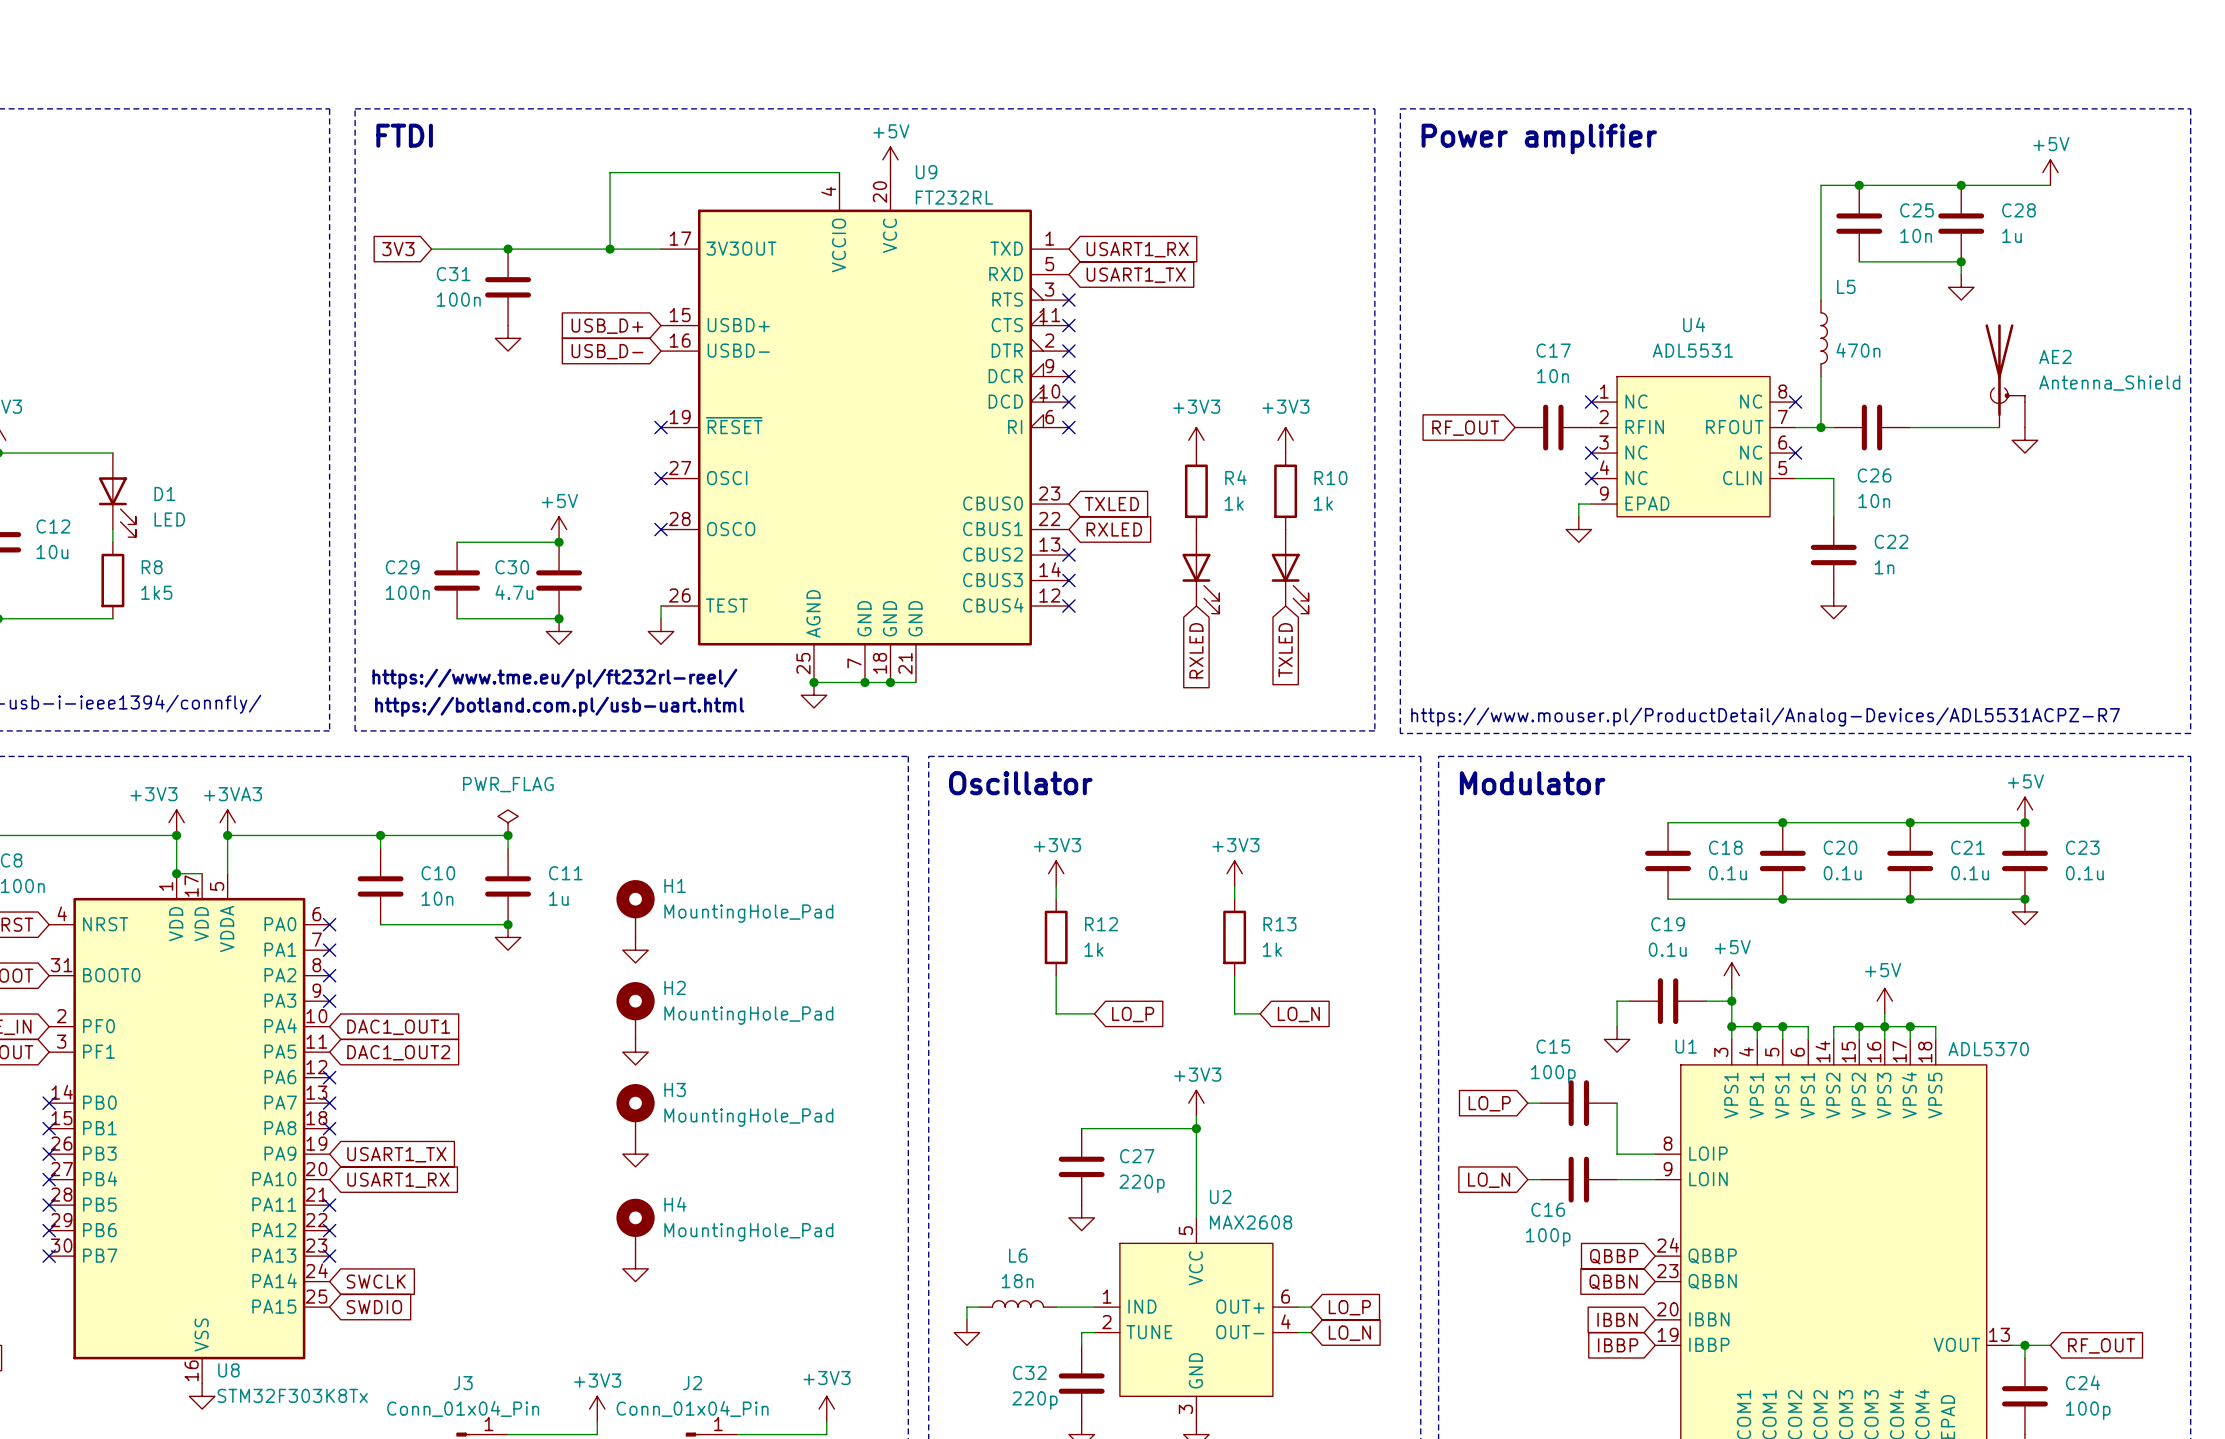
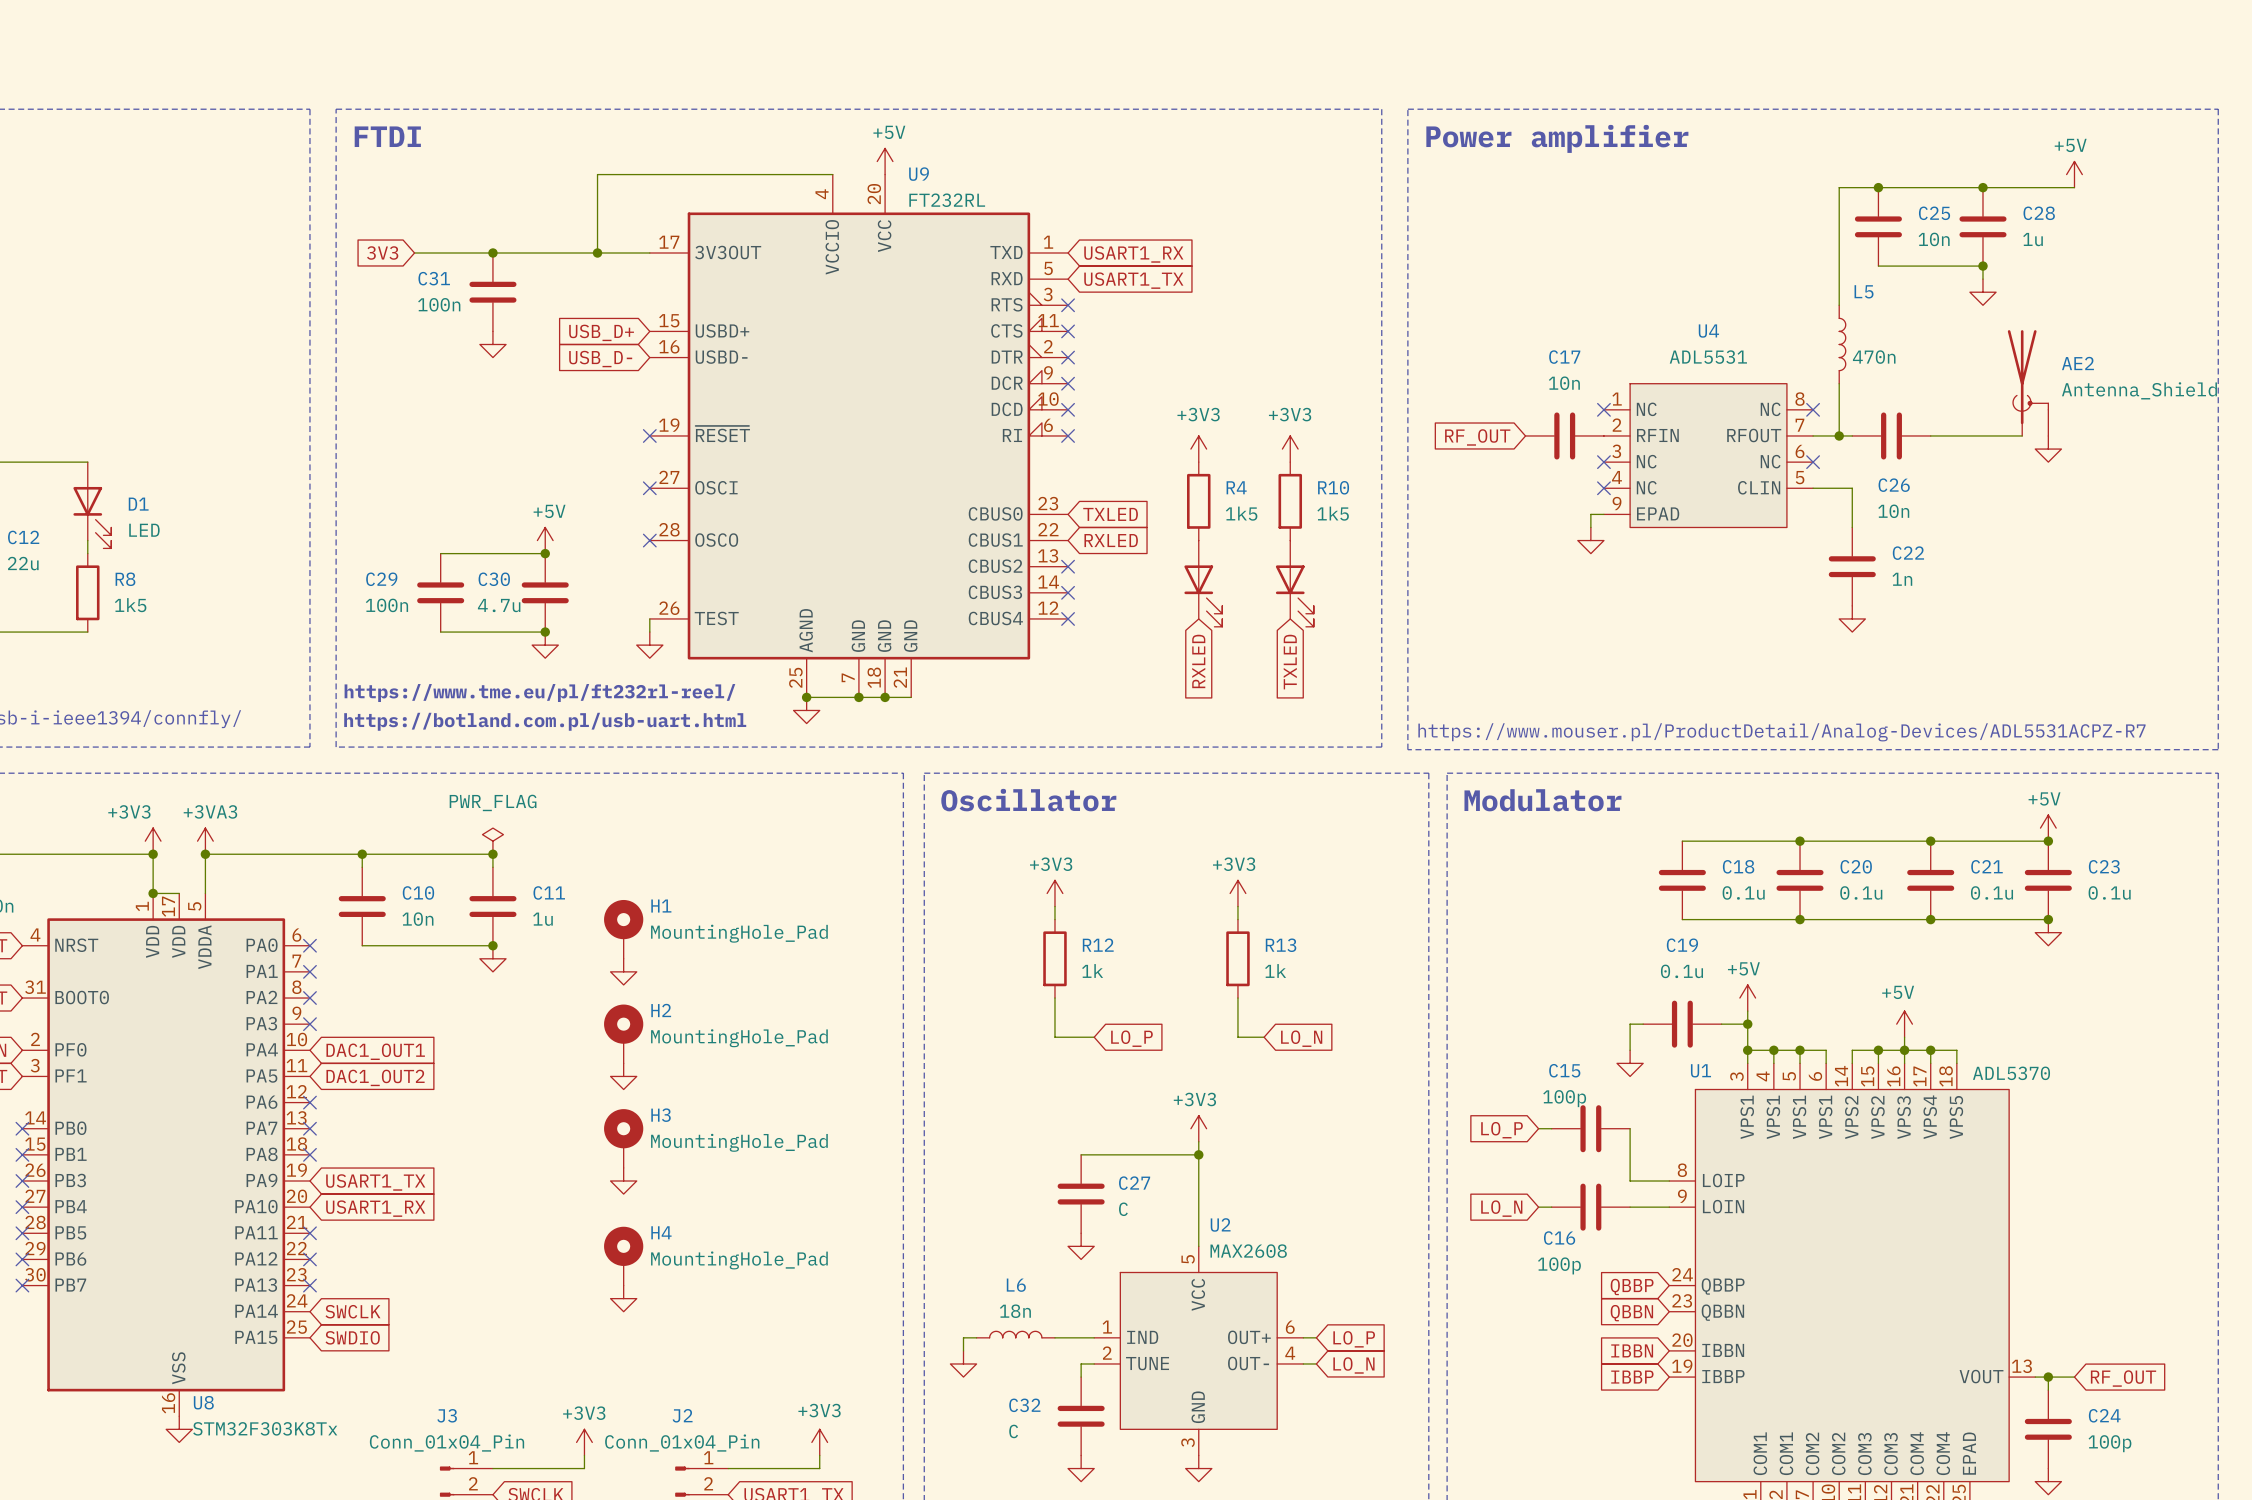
R4 value: 1k (1234, 503) -> 1k5 (1241, 513)
R10 value: 1k (1323, 503) -> 1k5 (1333, 513)
C12 value: 10u (52, 551) -> 22u (23, 563)
C27 value: 220p (1142, 1183) -> C (1123, 1209)
C32 value: 220p (1034, 1400) -> C (1013, 1431)

